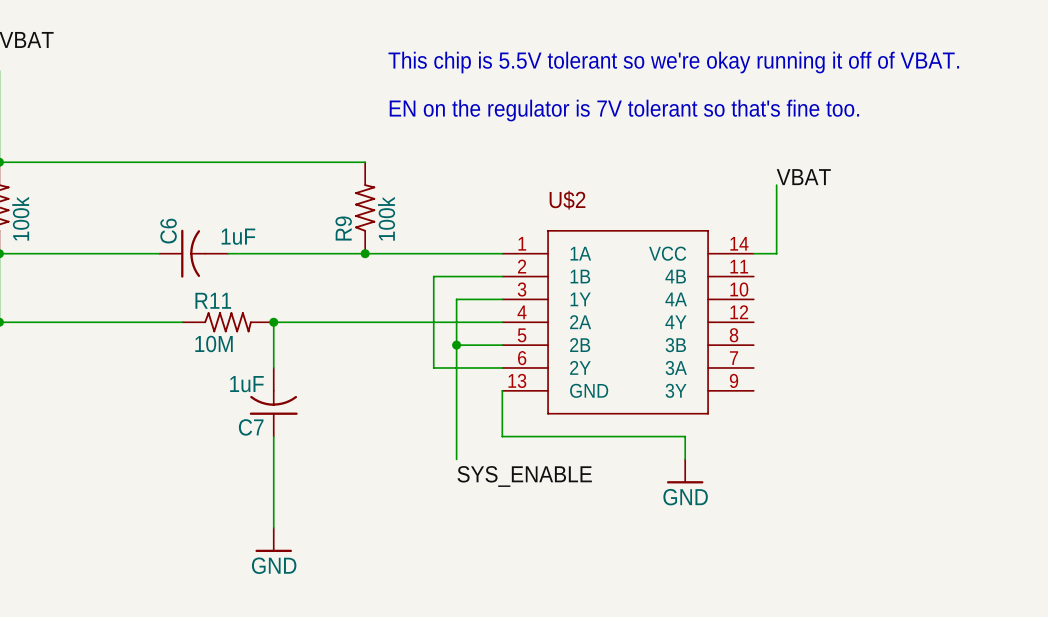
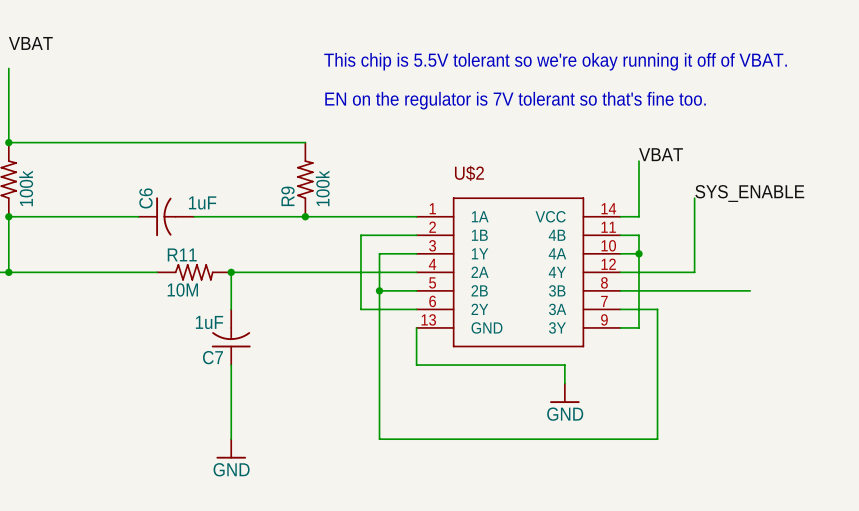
label: none -> SYS_ENABLE (749, 193)
wire: none -> (694, 198) (694, 272) (620, 272)
wire: none -> (620, 235) (639, 235) (639, 327) (620, 327)
wire: none -> (620, 253) (639, 253)
junction: none -> (639, 253)
wire: none -> (620, 290) (750, 290)
wire: none -> (620, 309) (657, 309) (657, 439) (379, 439) (379, 383)
label: SYS_ENABLE (524, 476) -> none

